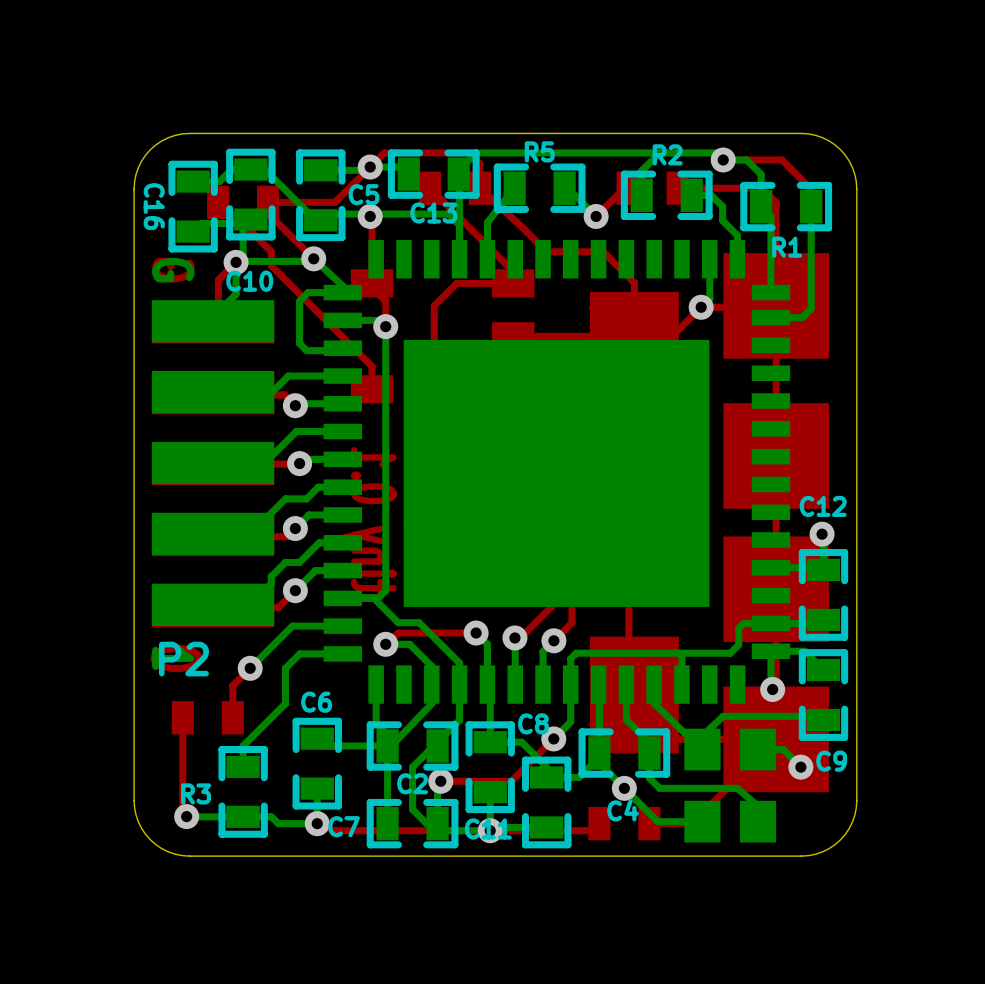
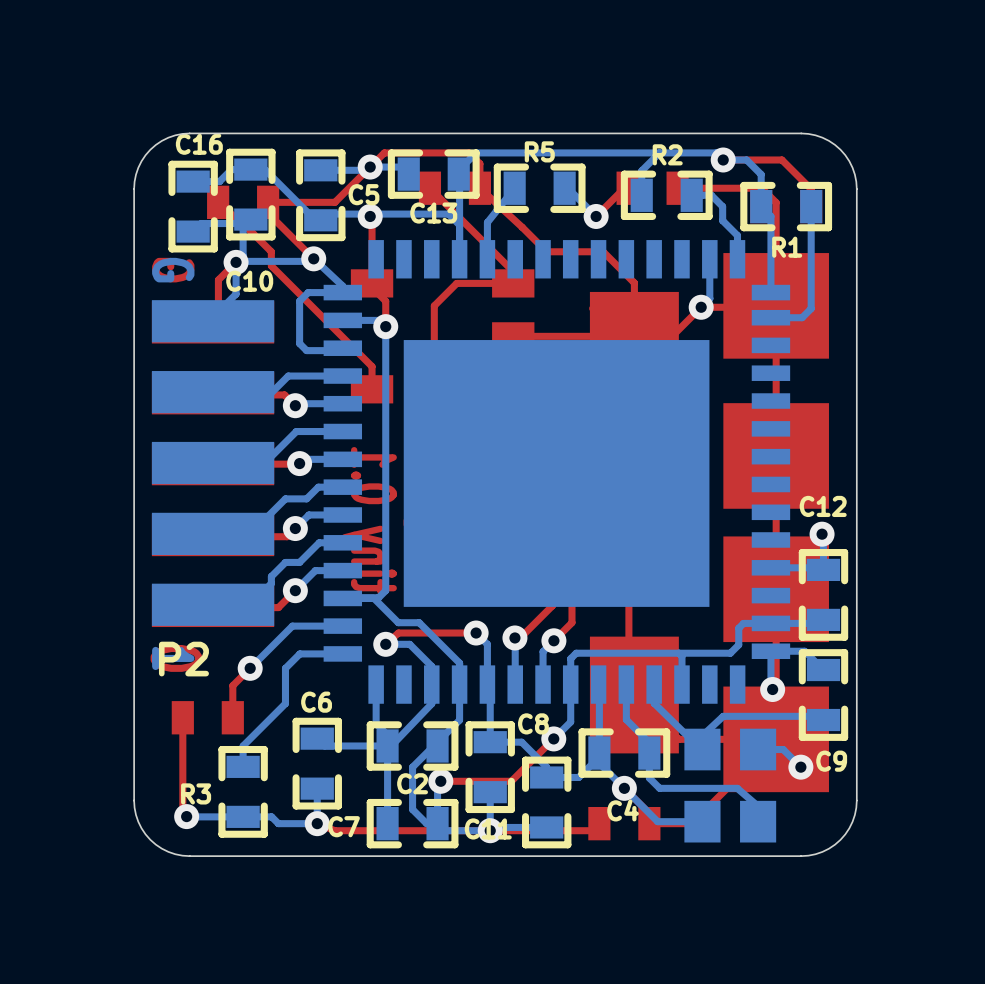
C16 name rotation: 0° (154, 206) -> 90° counterclockwise (199, 144)
C16 name position: C16 (154, 206) -> C16 (199, 144)

